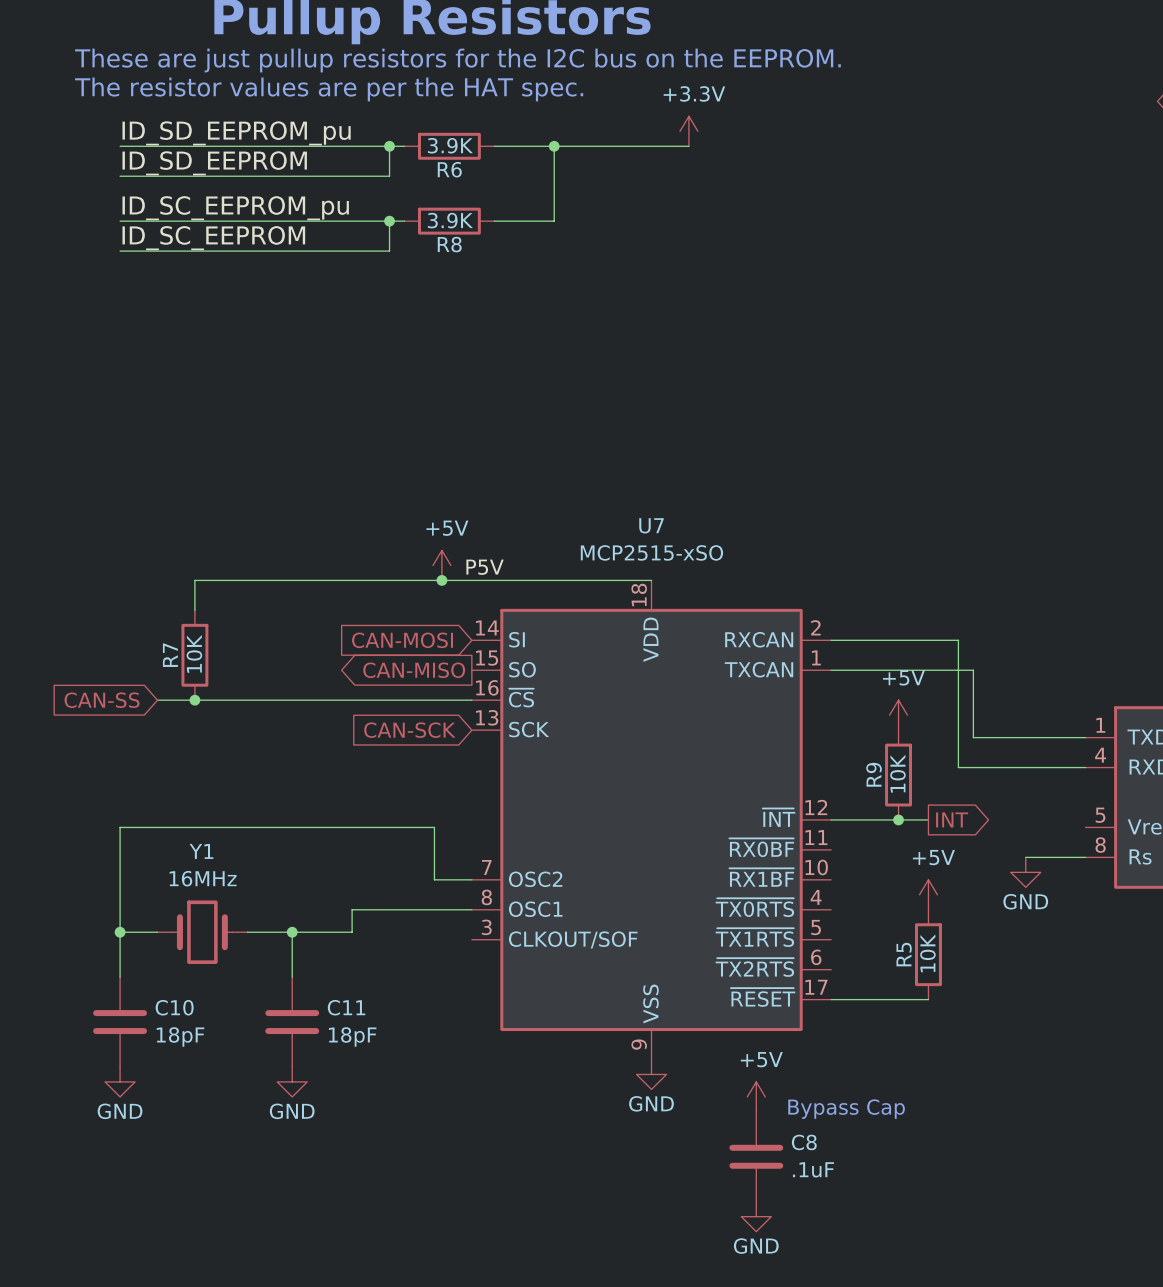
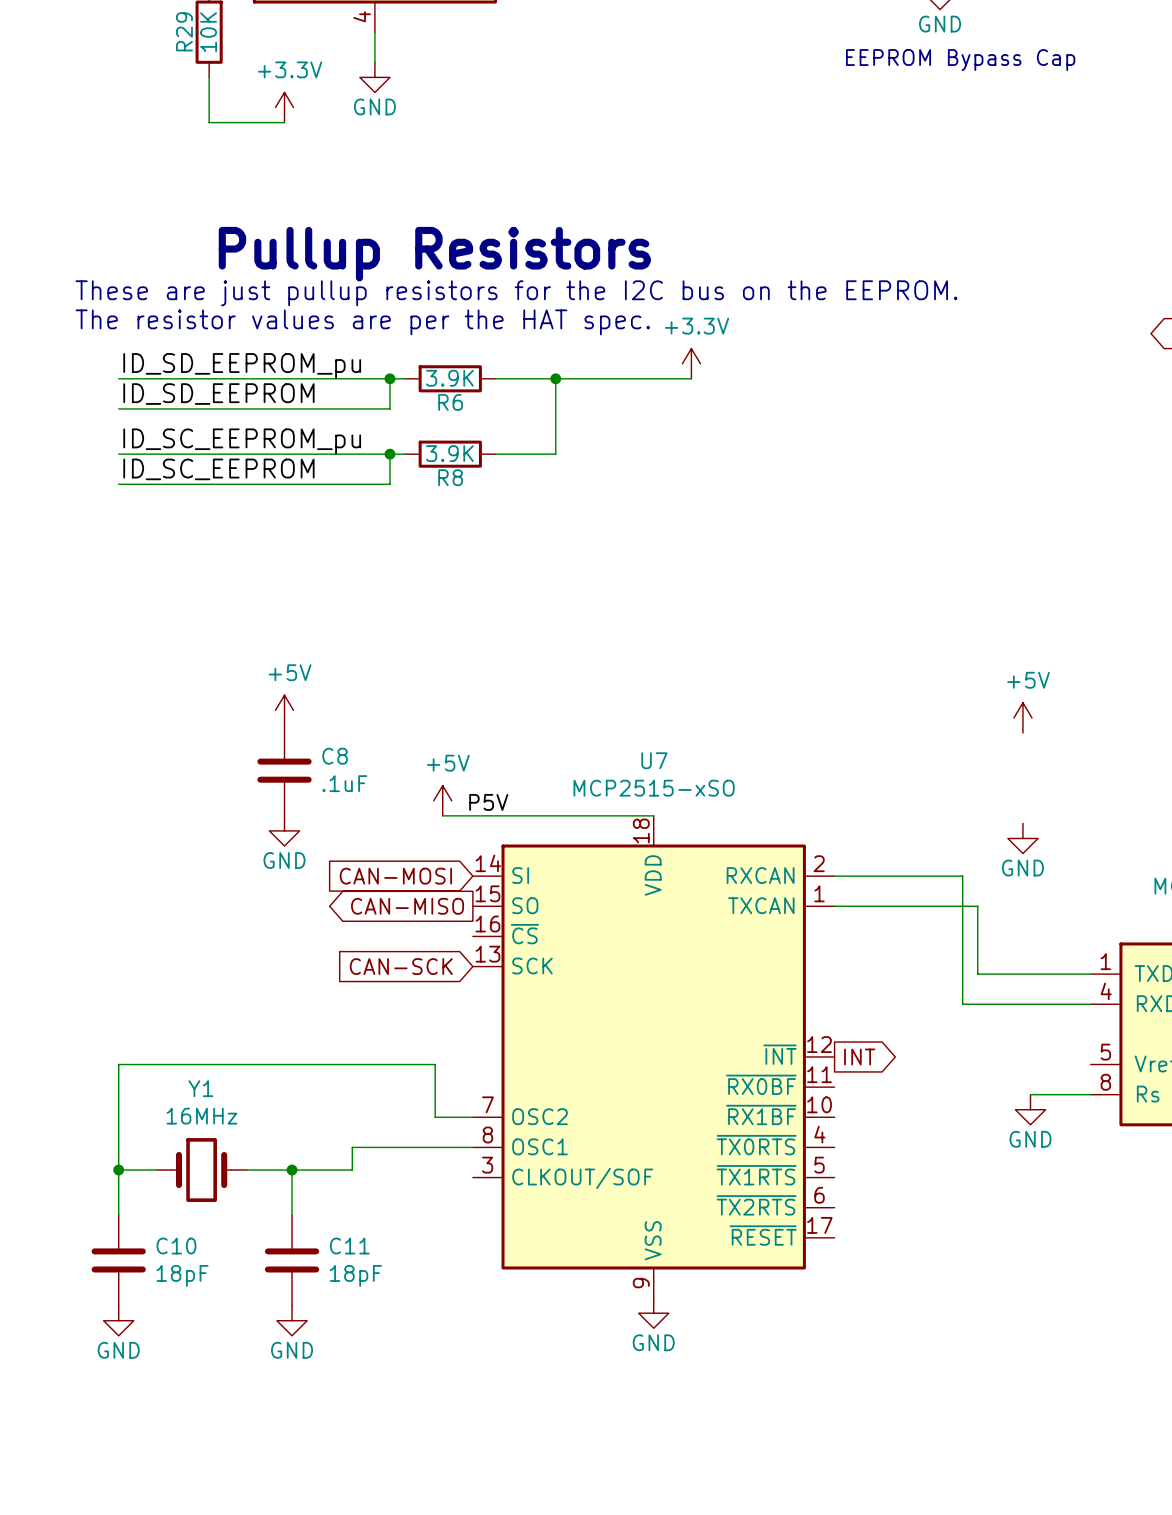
power symbol: none -> +5V (284, 710)
power symbol: none -> +5V (1022, 717)
wire: (441, 580) (194, 580) (194, 610) -> none
junction: (441, 580) -> none
power symbol: none -> GND (284, 830)
power symbol: none -> GND (1022, 838)
R7: 10K (194, 655) -> none
global label: CAN-SS (102, 700) -> none
wire: (157, 700) (471, 700) -> none
junction: (194, 700) -> none
power symbol: +5V (898, 715) -> none
R9: 10K (898, 775) -> none
wire: (831, 819) (928, 819) -> none
junction: (898, 819) -> none
global label position: INT (952, 819) -> INT (859, 1056)
power symbol: +5V (928, 894) -> none
R5: 10K (928, 954) -> none
wire: (831, 999) (928, 999) -> none
power symbol: +5V (756, 1096) -> none
text: Bypass Cap (846, 1109) -> none
C8 position: (756, 1156) -> (284, 770)
power symbol: GND (756, 1216) -> none

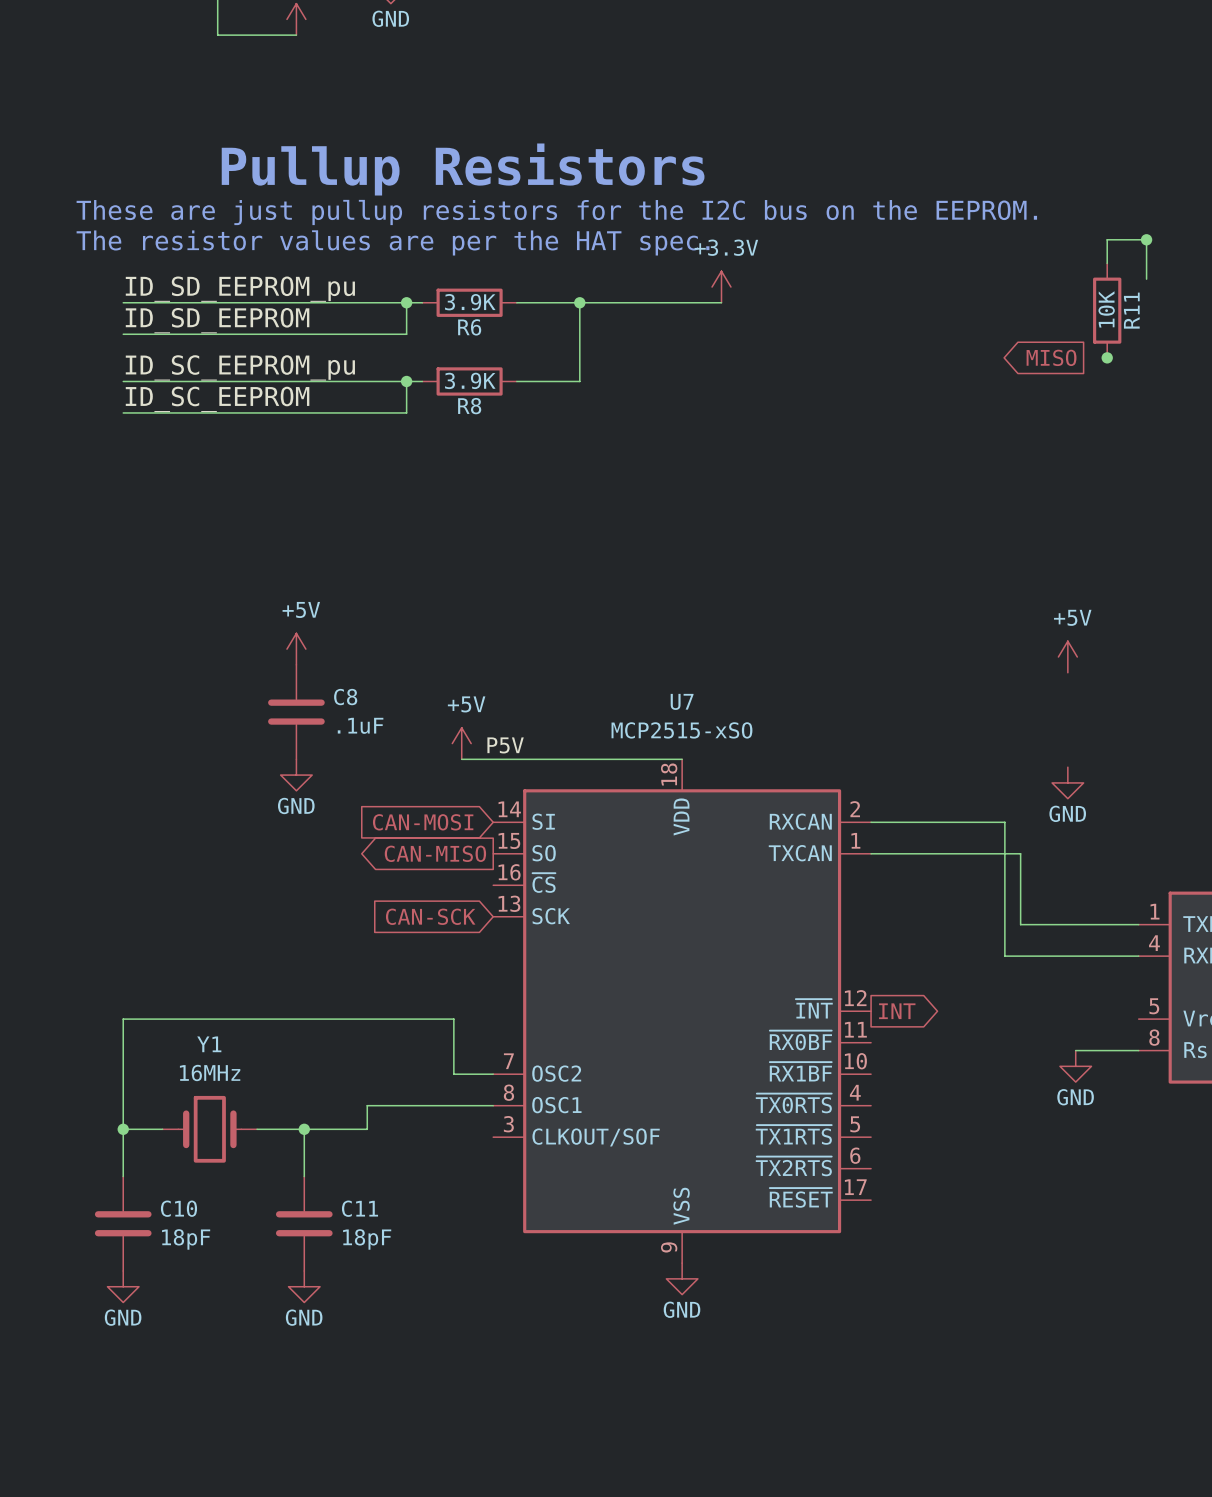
junction: none -> (1146, 239)
wire: none -> (1107, 263) (1107, 239) (1146, 239) (1146, 279)
R11: none -> 10K (1107, 310)
global label: none -> MISO (1051, 357)
junction: none -> (1107, 357)

